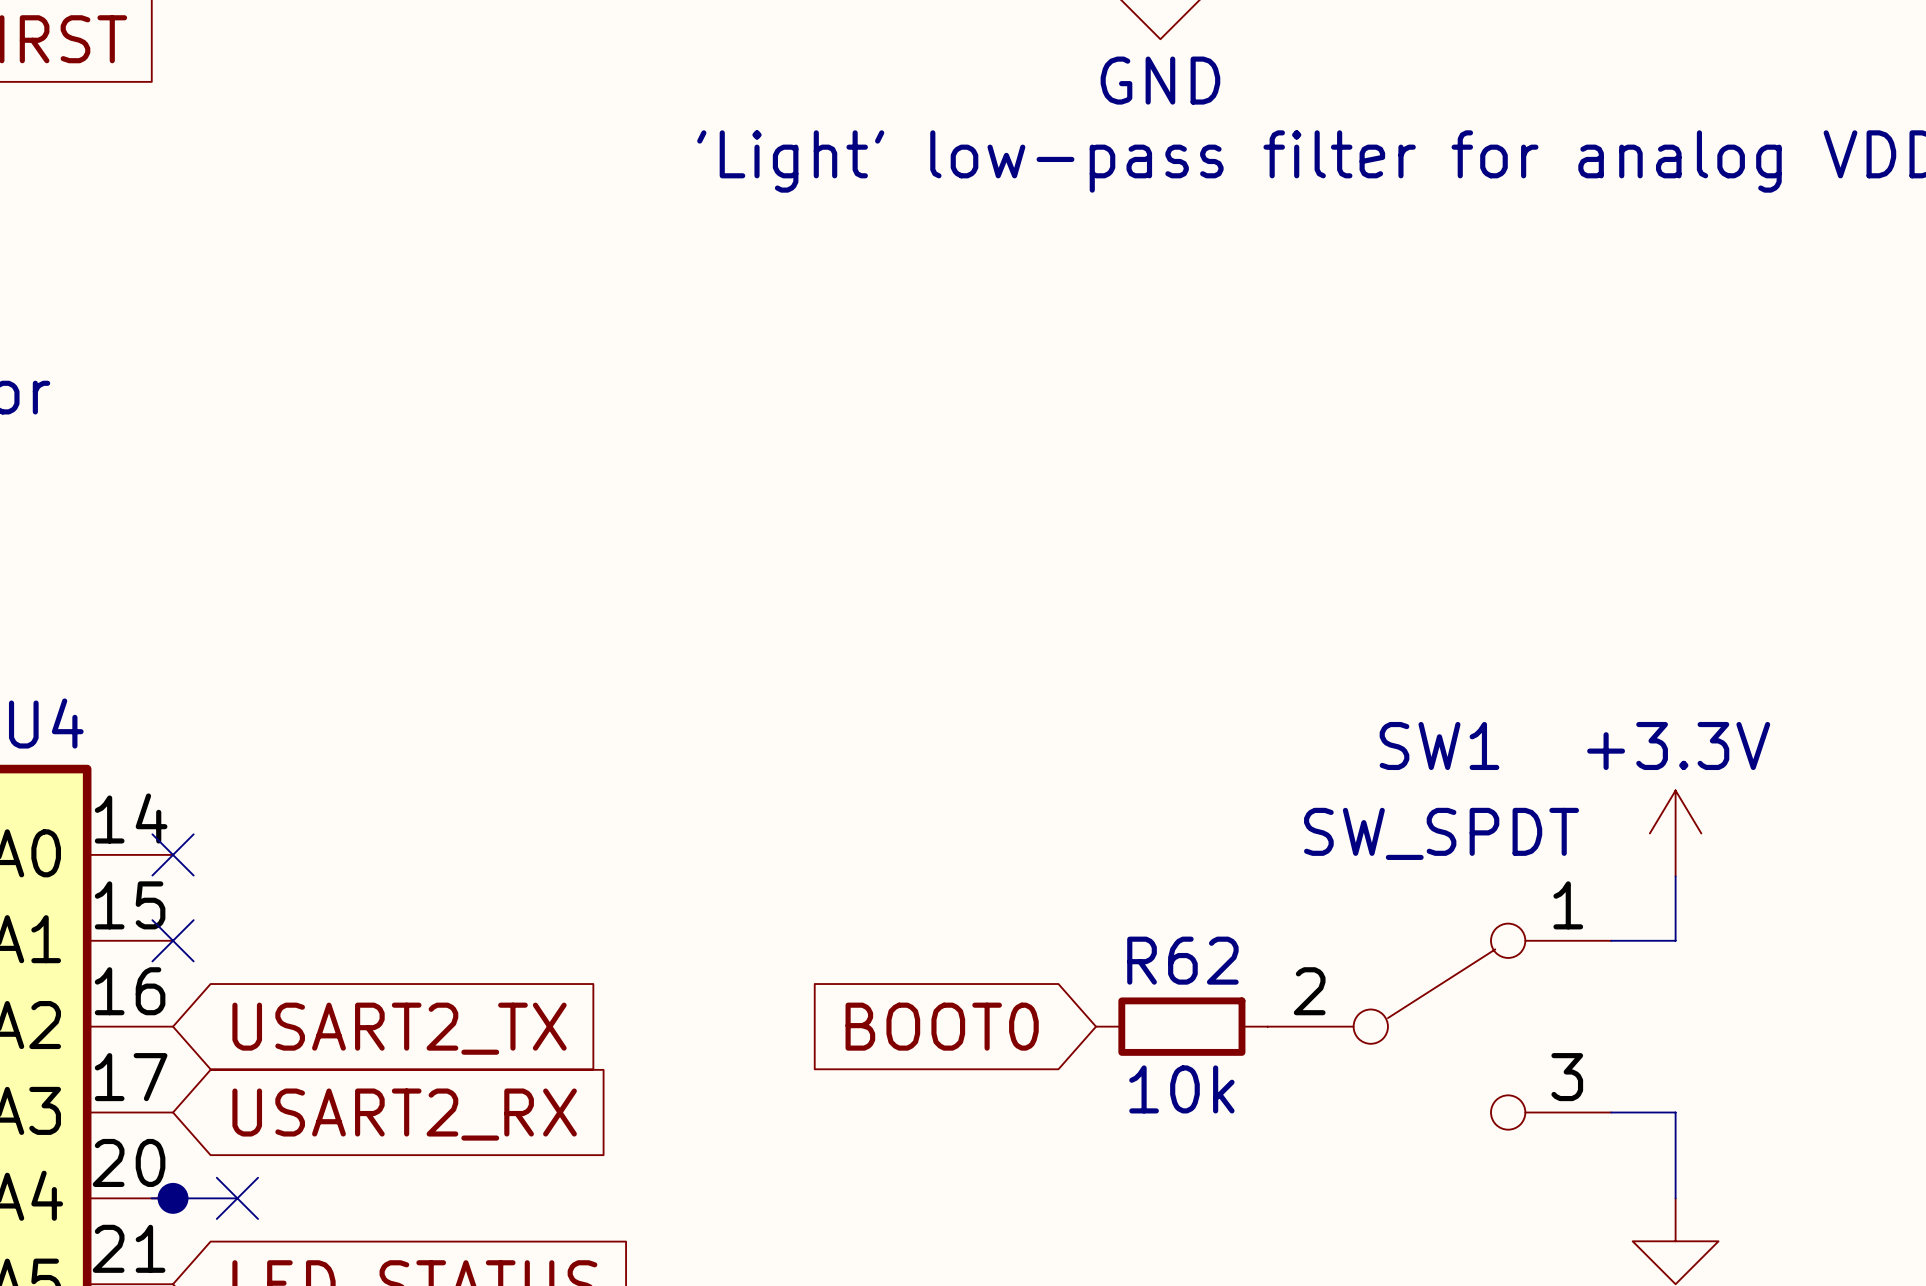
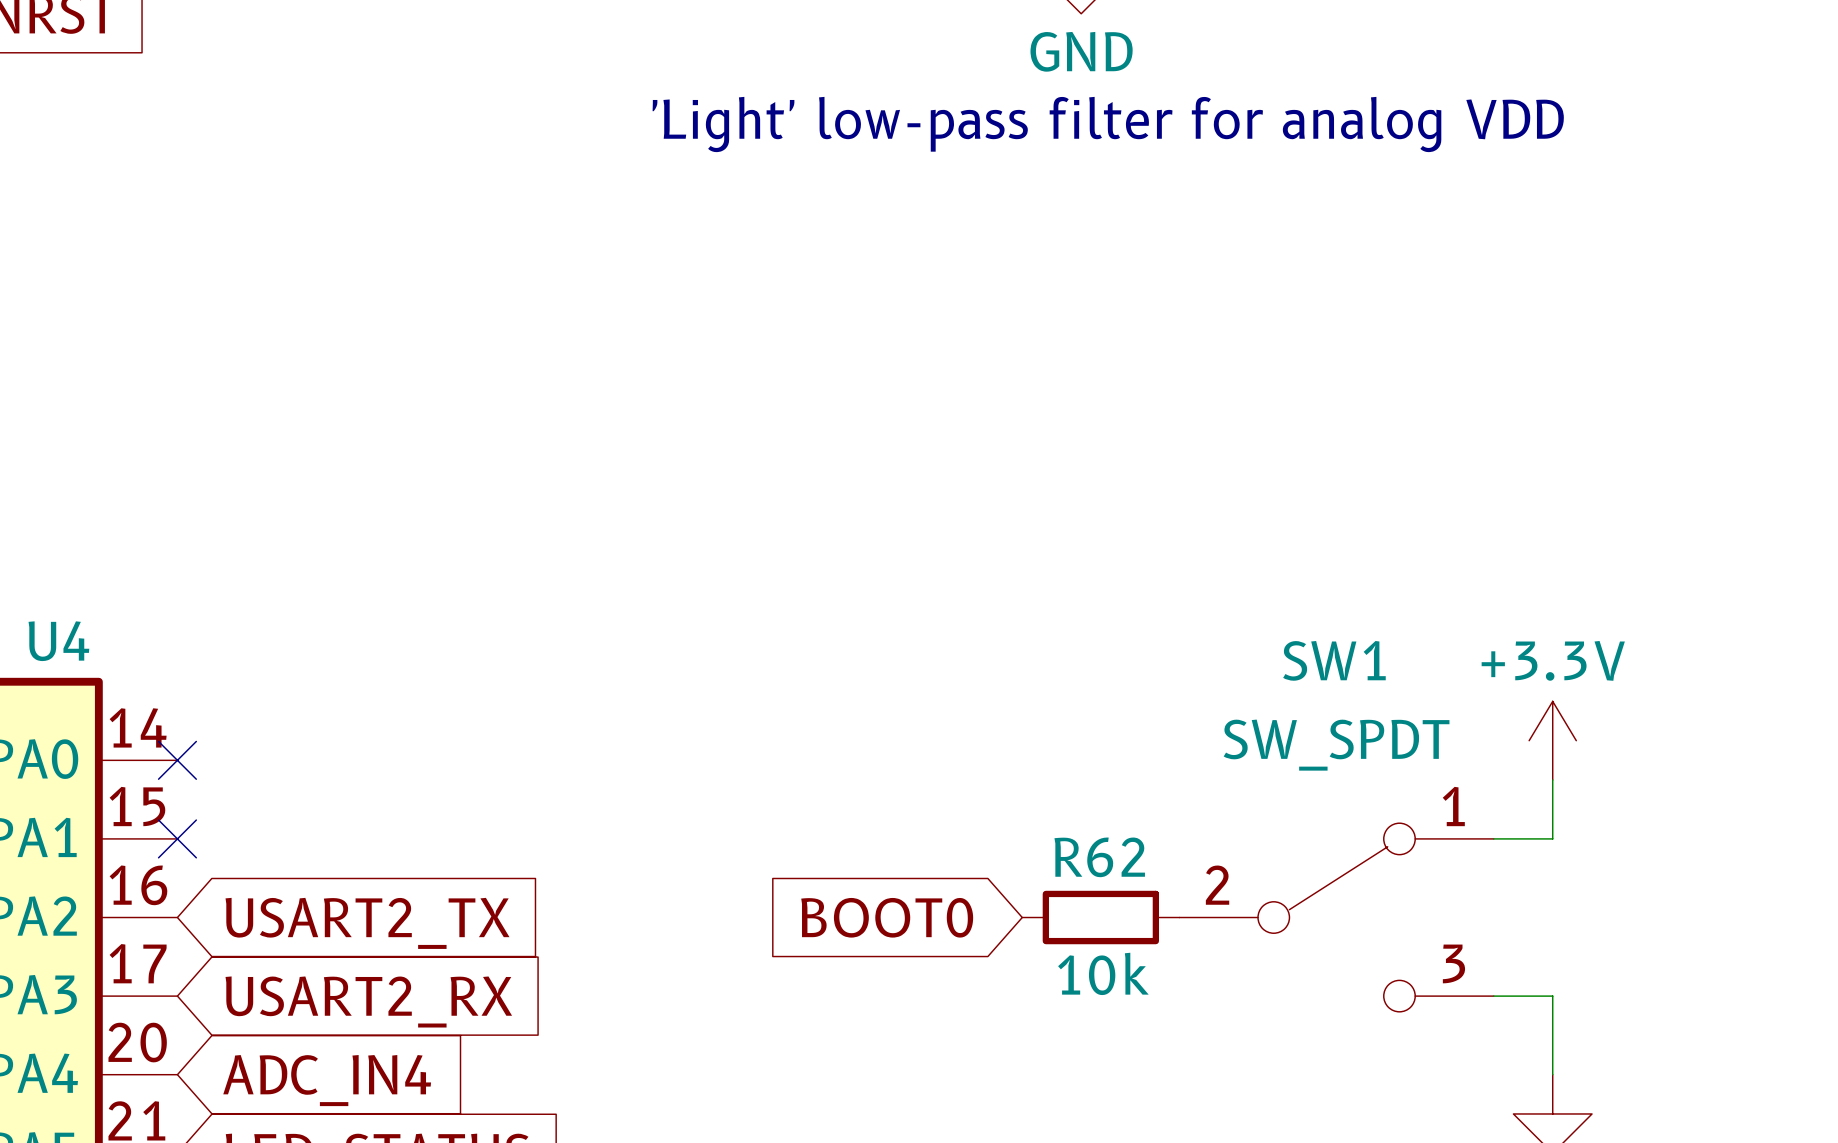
wire: (151, 1198) (237, 1198) -> none
junction: (173, 1198) -> none
no-connect mark: (237, 1198) -> none
global label: none -> ADC_IN4 (327, 1080)

